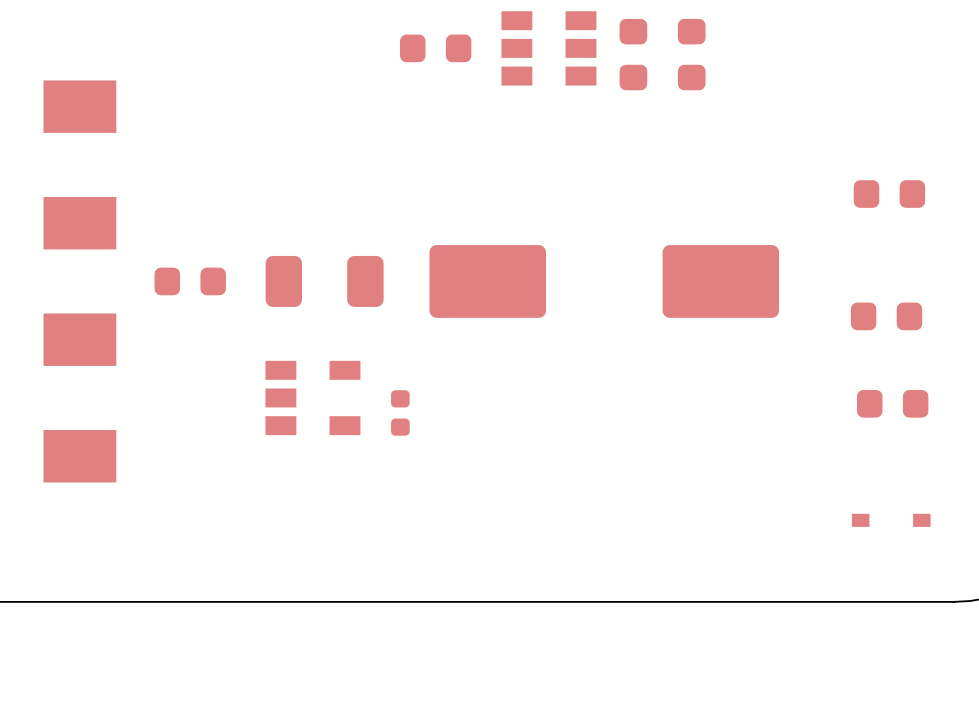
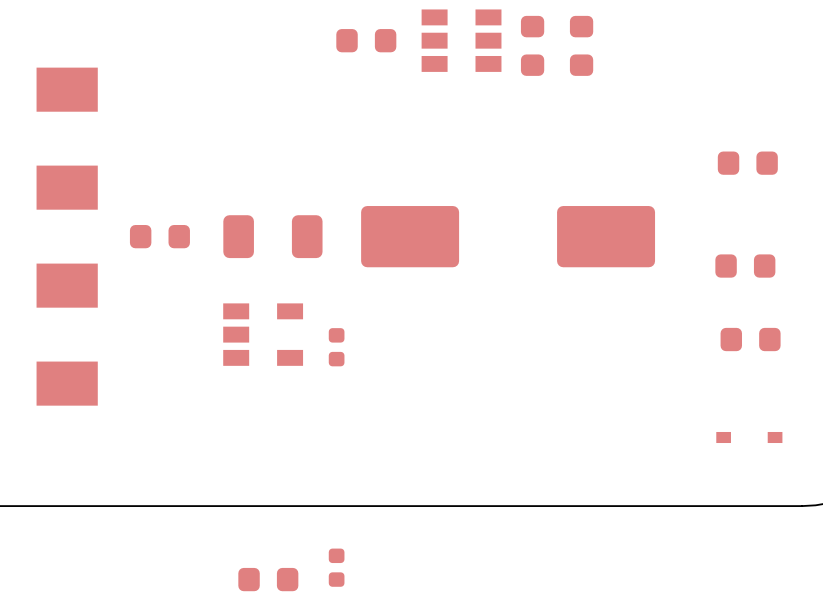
part: none -> (336, 567)
part: none -> (268, 579)

